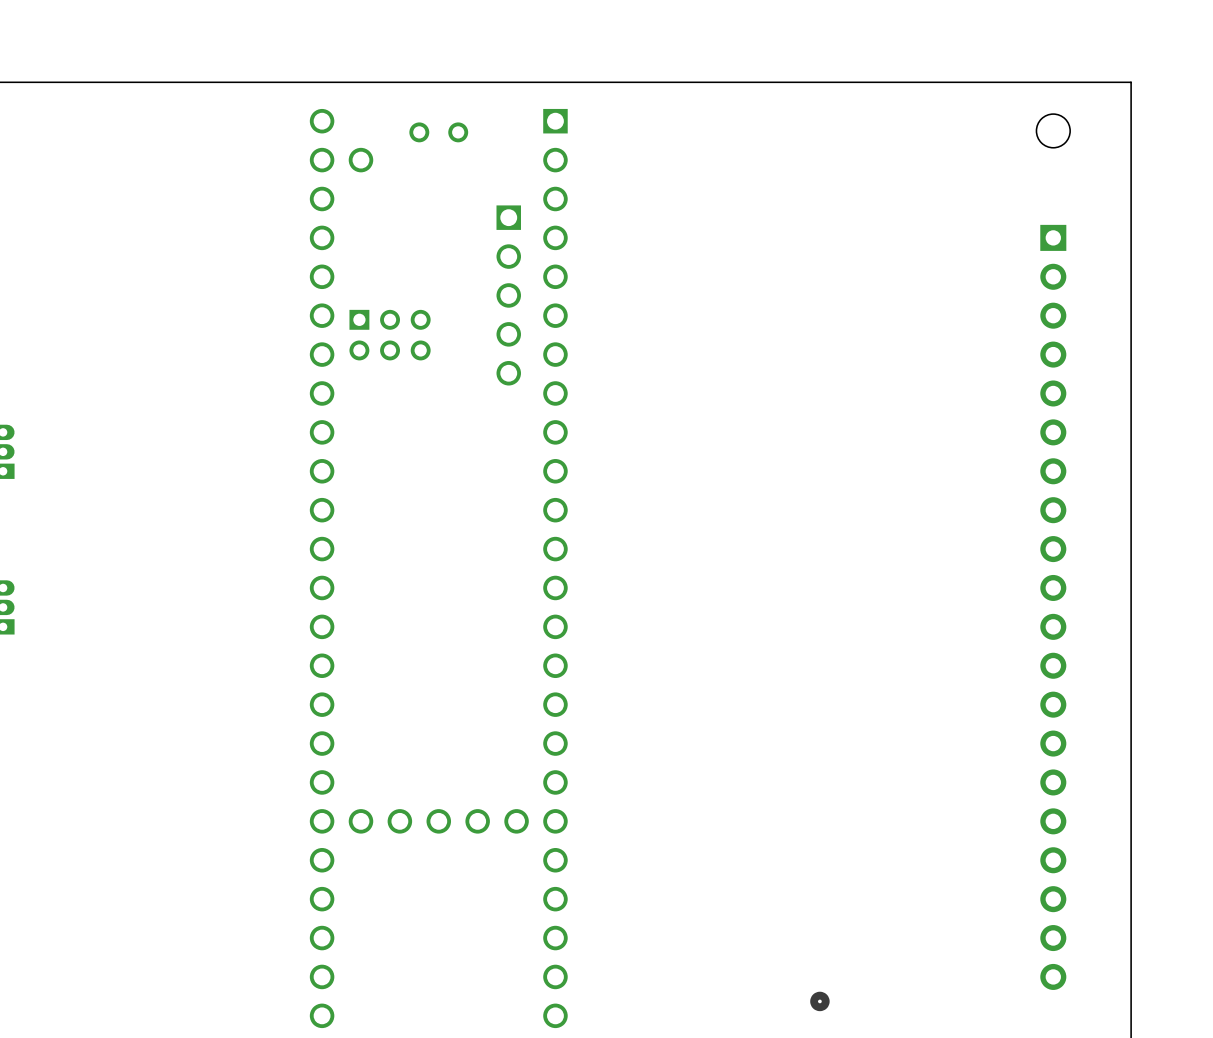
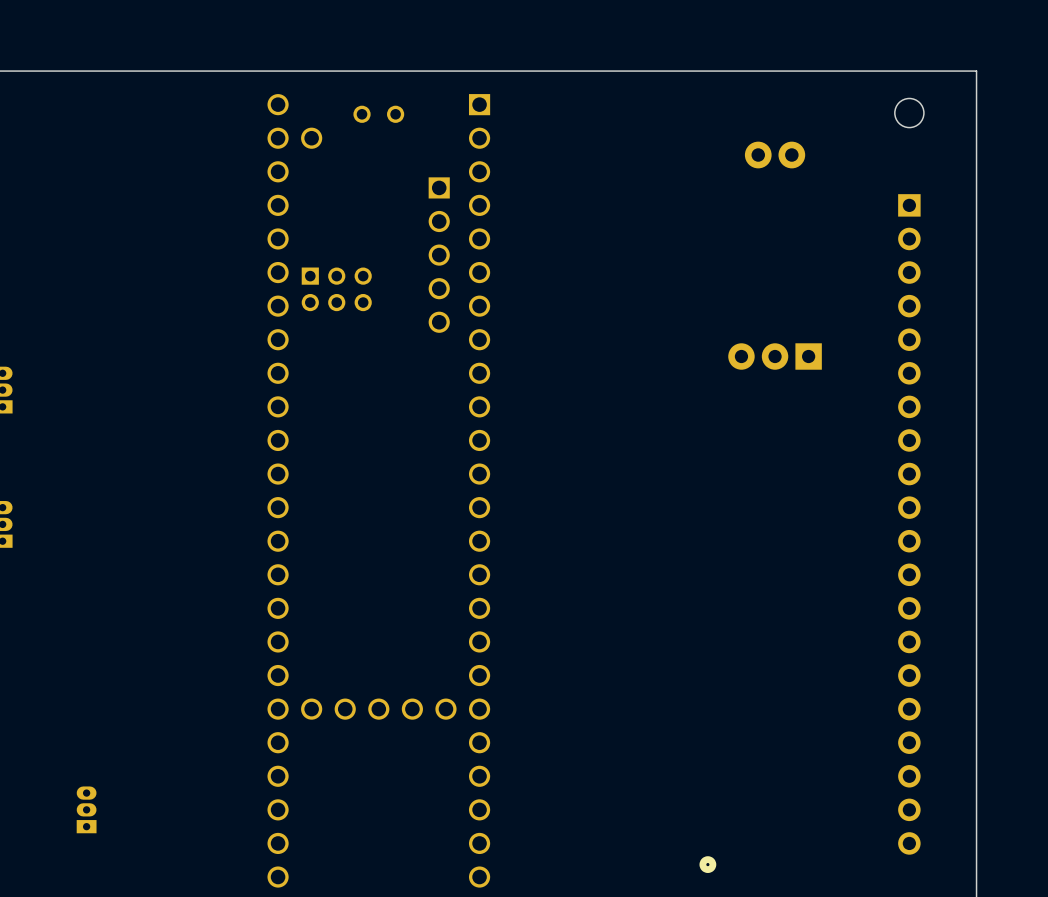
part: none -> (775, 155)
part: none -> (775, 356)
part: none -> (86, 809)

